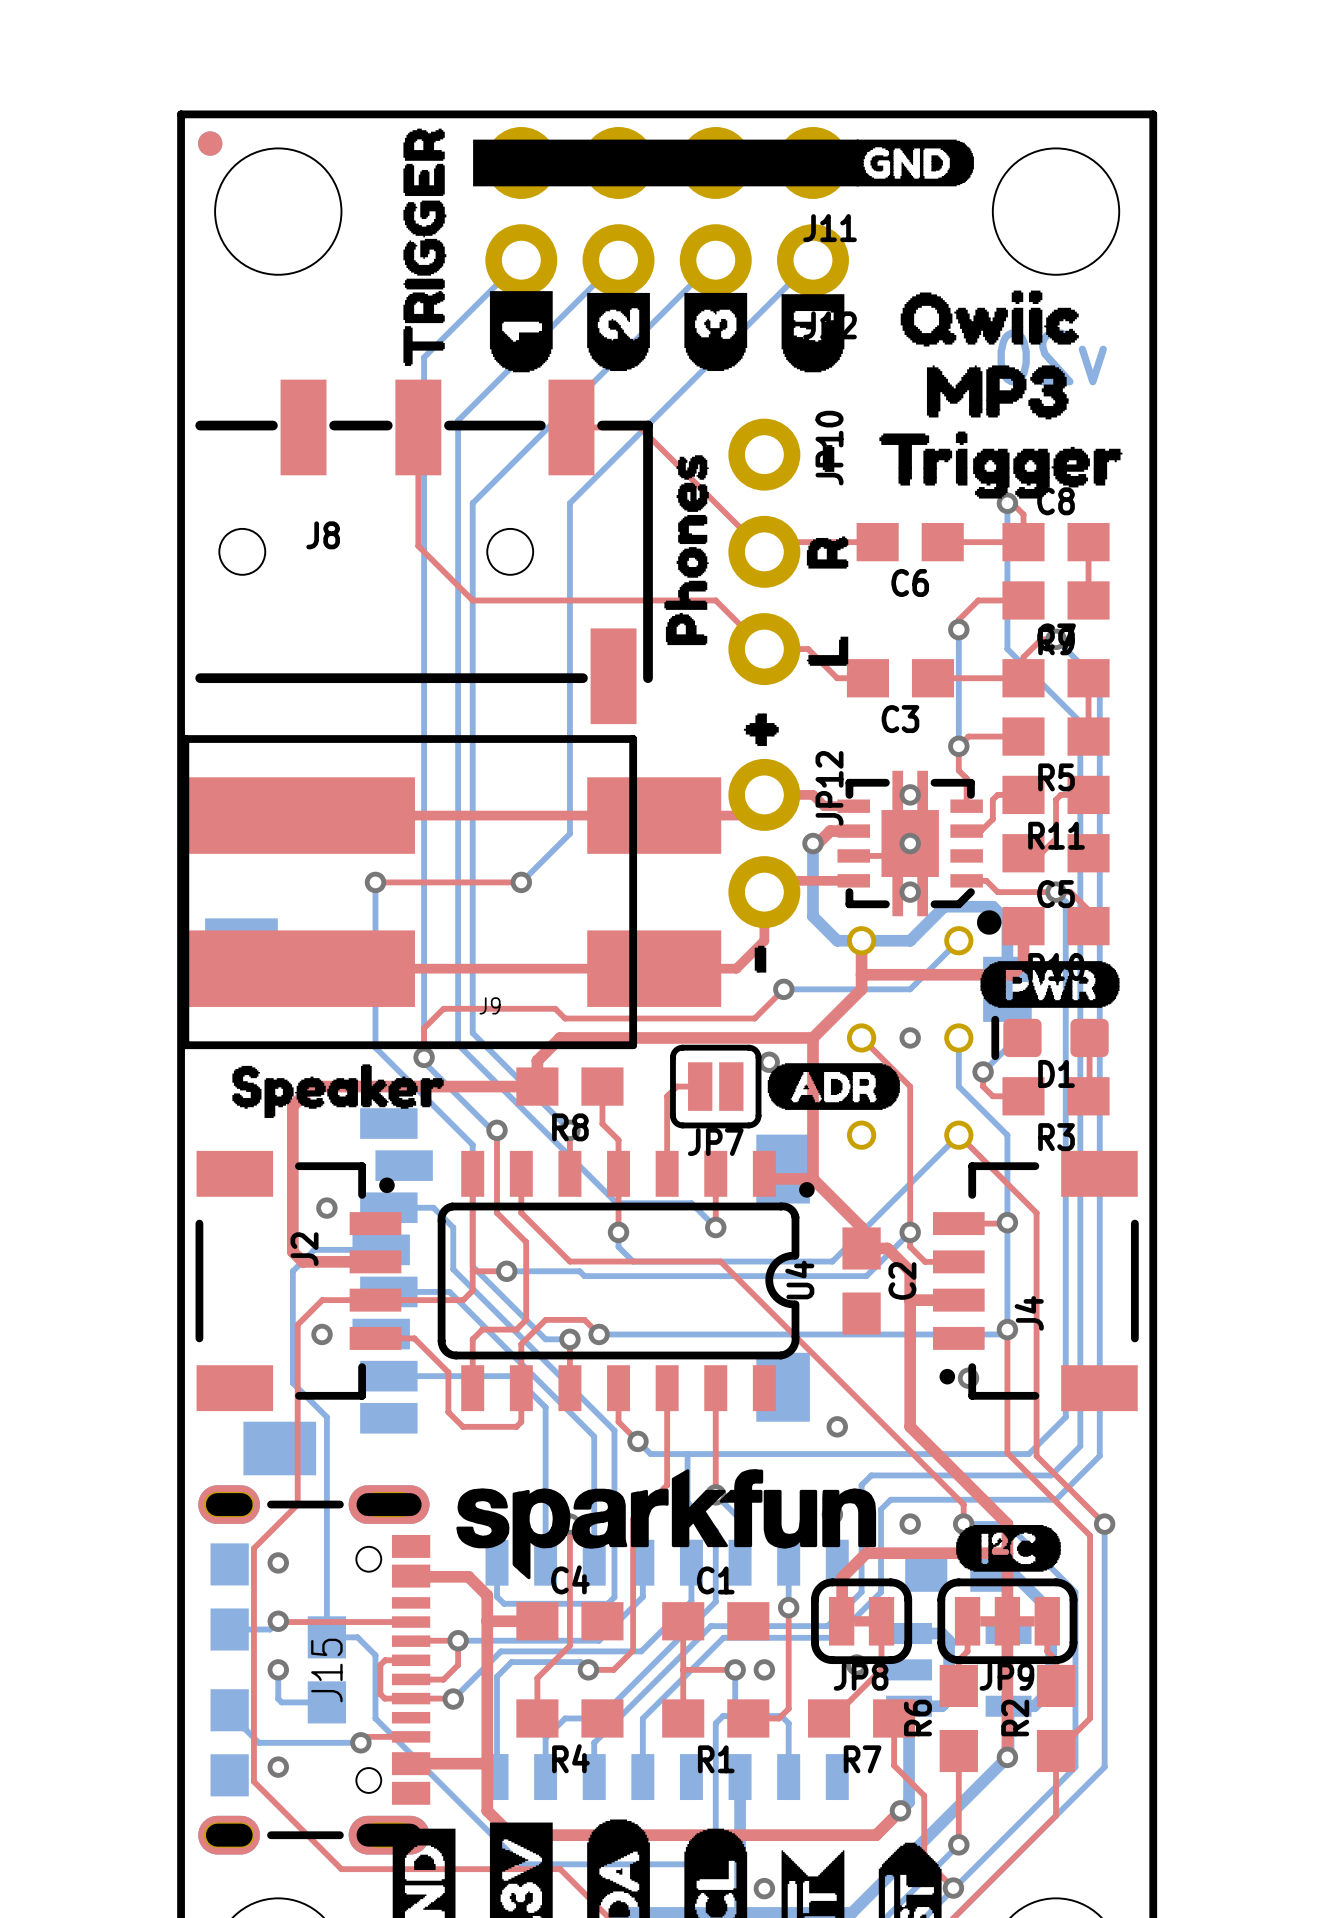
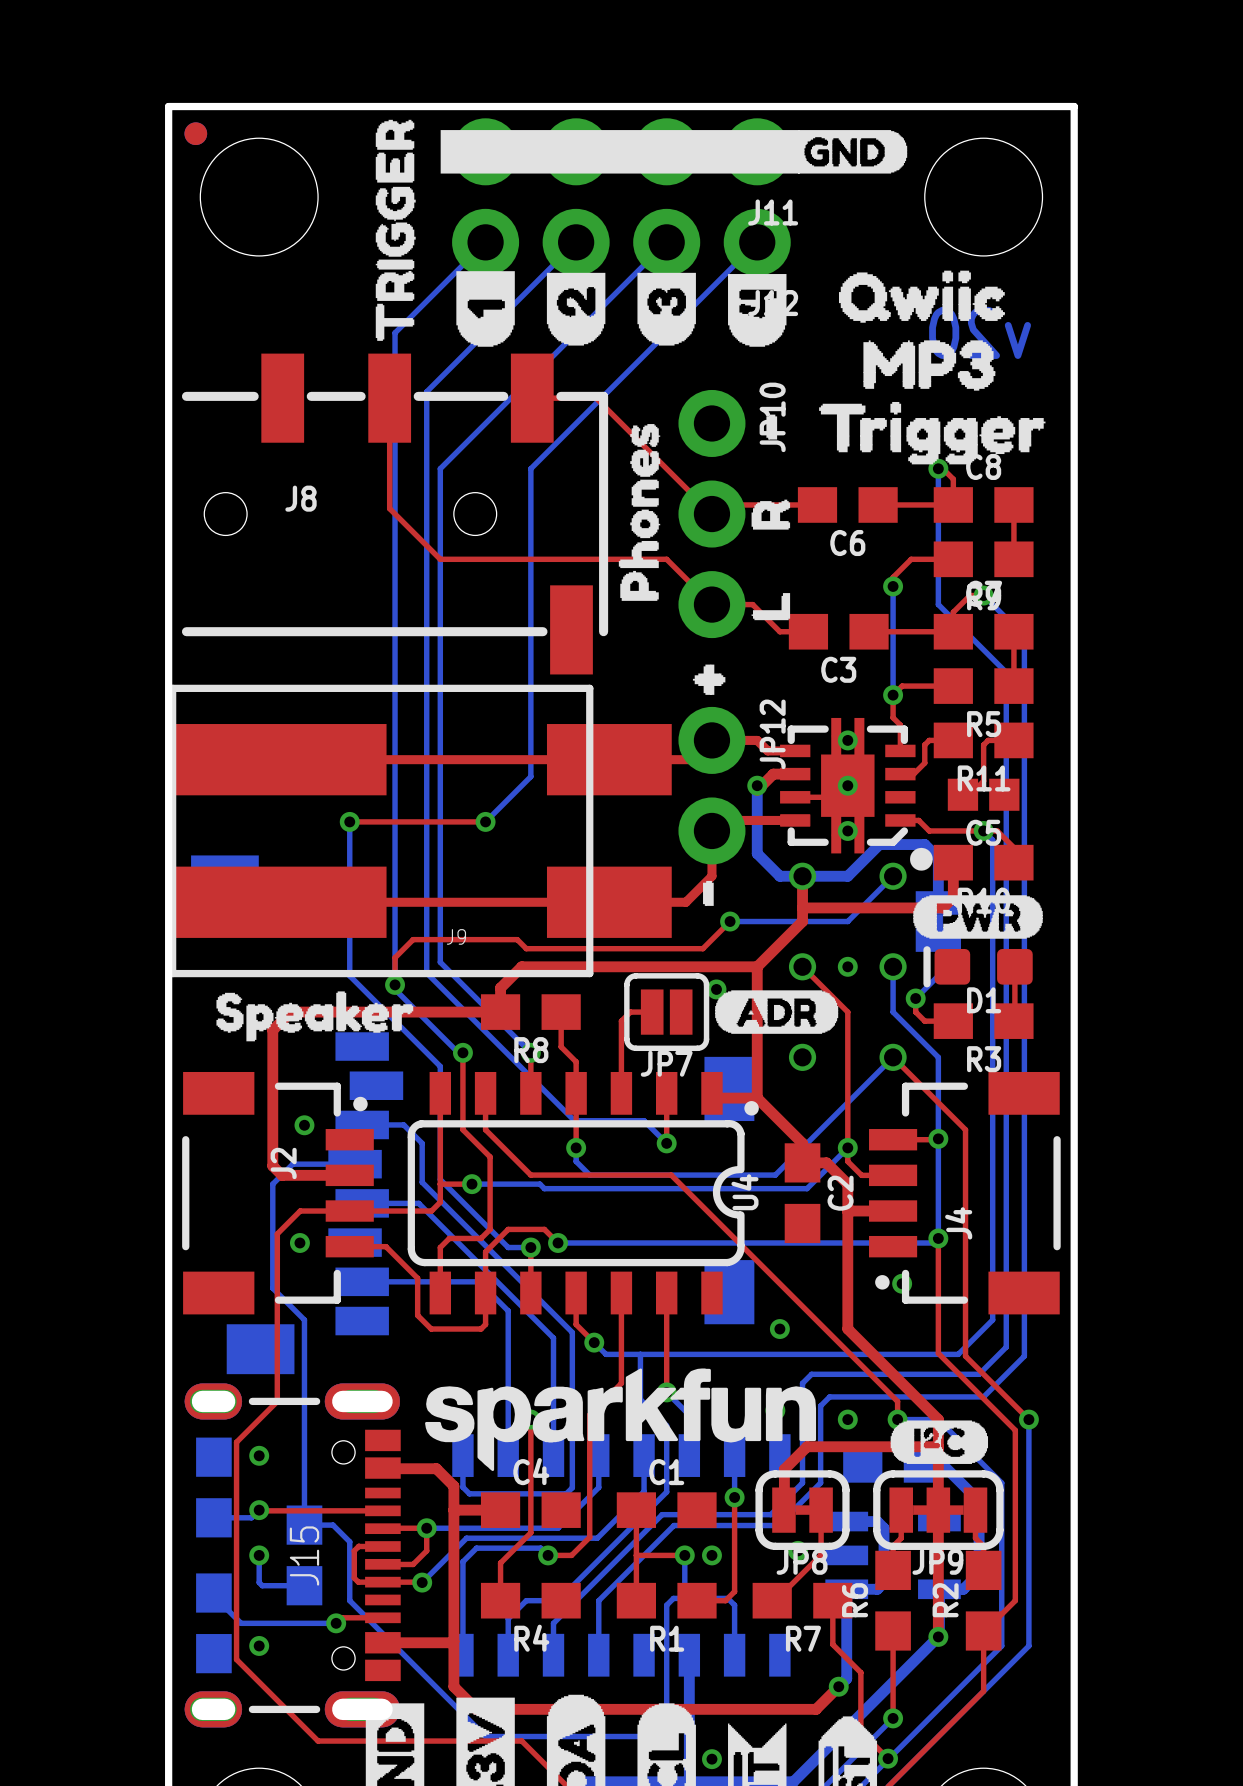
C5 footprint: [1002, 834, 1110, 873] -> [947, 778, 1020, 811]

